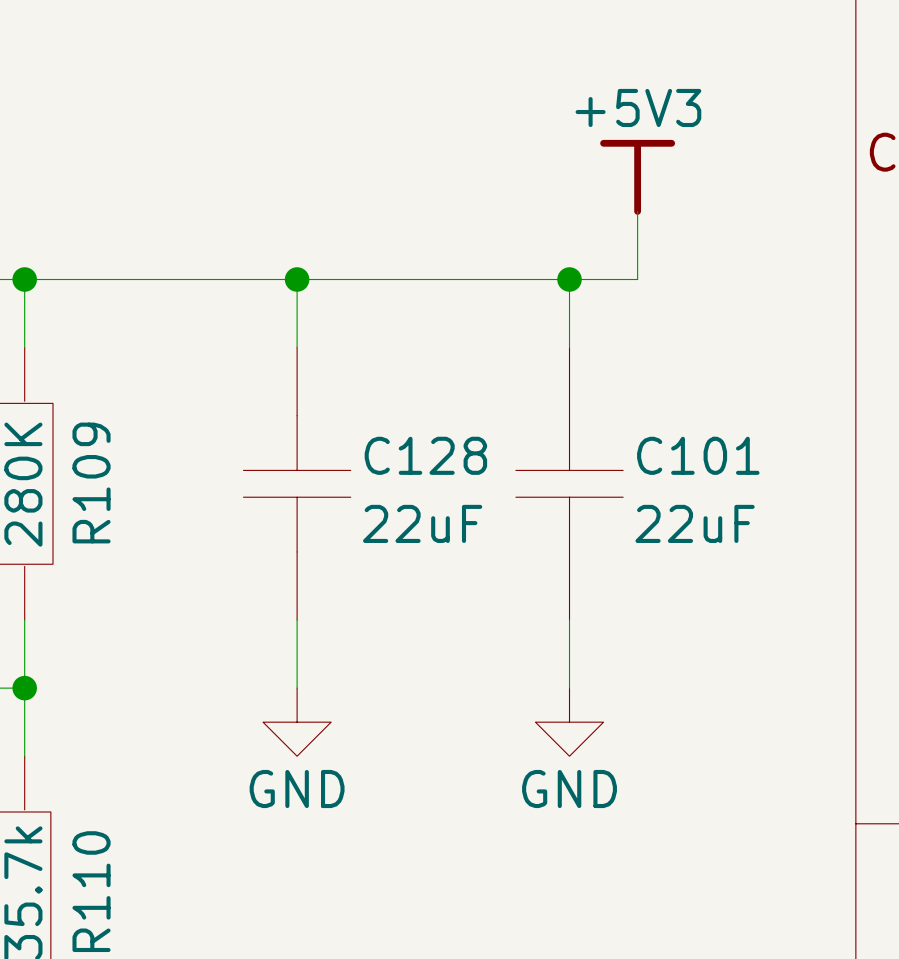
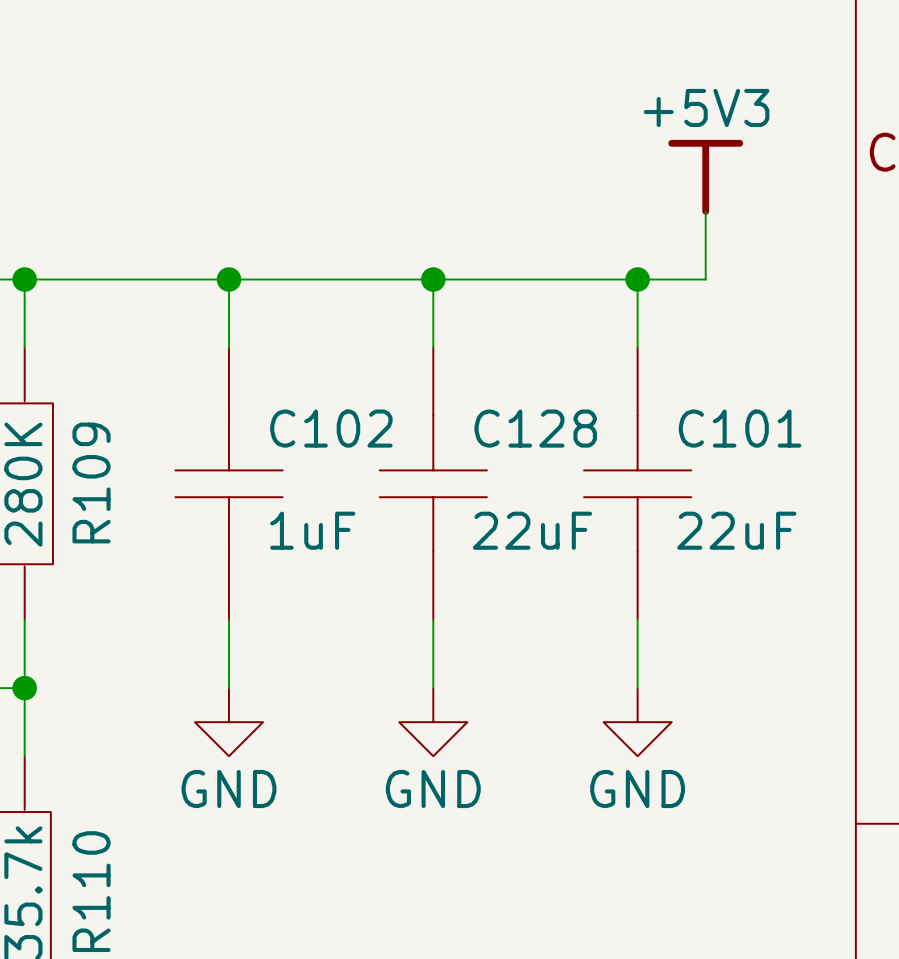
power symbol position: +5V3 (637, 177) -> +5V3 (705, 177)
wire: (637, 211) (637, 279) -> (637, 620) (637, 688)
wire: none -> (705, 211) (705, 279) (637, 279) (637, 347)
junction: none -> (228, 279)
wire: (297, 279) (297, 347) -> (228, 279) (228, 347)
junction: (297, 279) -> none
junction: none -> (433, 279)
wire: (569, 279) (569, 347) -> (433, 279) (433, 347)
junction: (569, 279) -> none
junction: none -> (637, 279)
C128 name position: C128 (425, 455) -> C128 (535, 428)
C101 name position: C101 (698, 455) -> C101 (740, 428)
C102: none -> 1uF (228, 483)
C128 position: (297, 483) -> (433, 483)
C101 position: (569, 483) -> (637, 483)
C128 value position: 22uF (422, 523) -> 22uF (532, 530)
C101 value position: 22uF (695, 523) -> 22uF (736, 530)
wire: (297, 620) (297, 688) -> (228, 620) (228, 688)
wire: (569, 620) (569, 688) -> (433, 620) (433, 688)
power symbol: none -> GND (228, 722)
power symbol: GND (297, 722) -> none
power symbol: none -> GND (433, 722)
power symbol: GND (569, 722) -> none
power symbol: none -> GND (637, 722)

